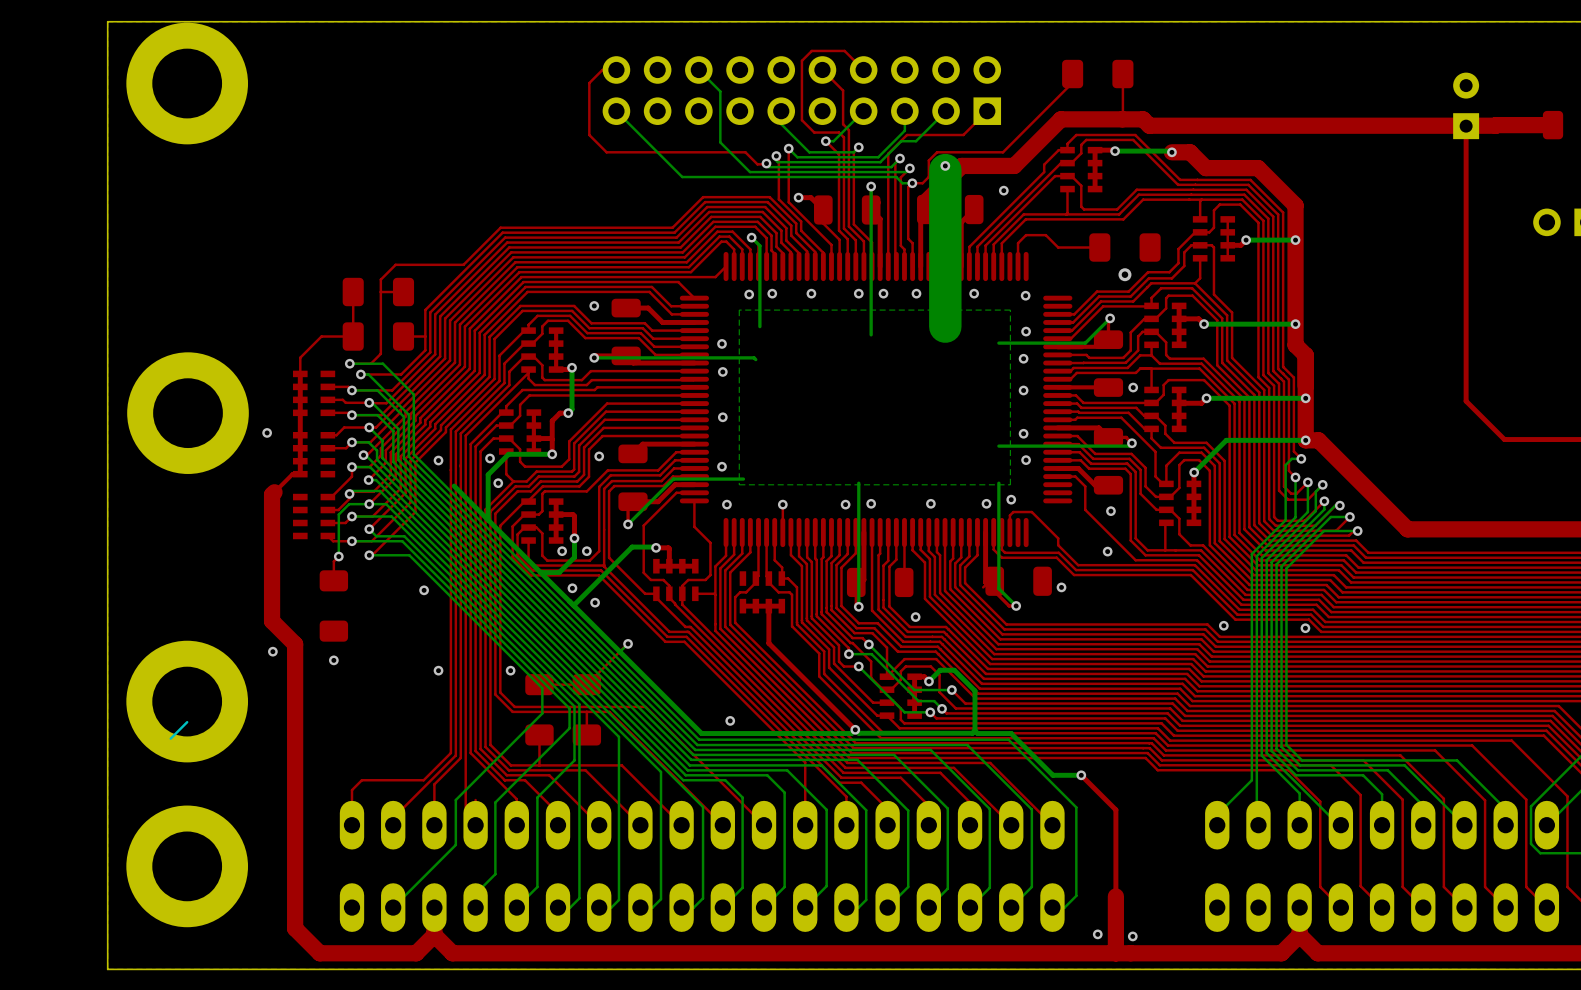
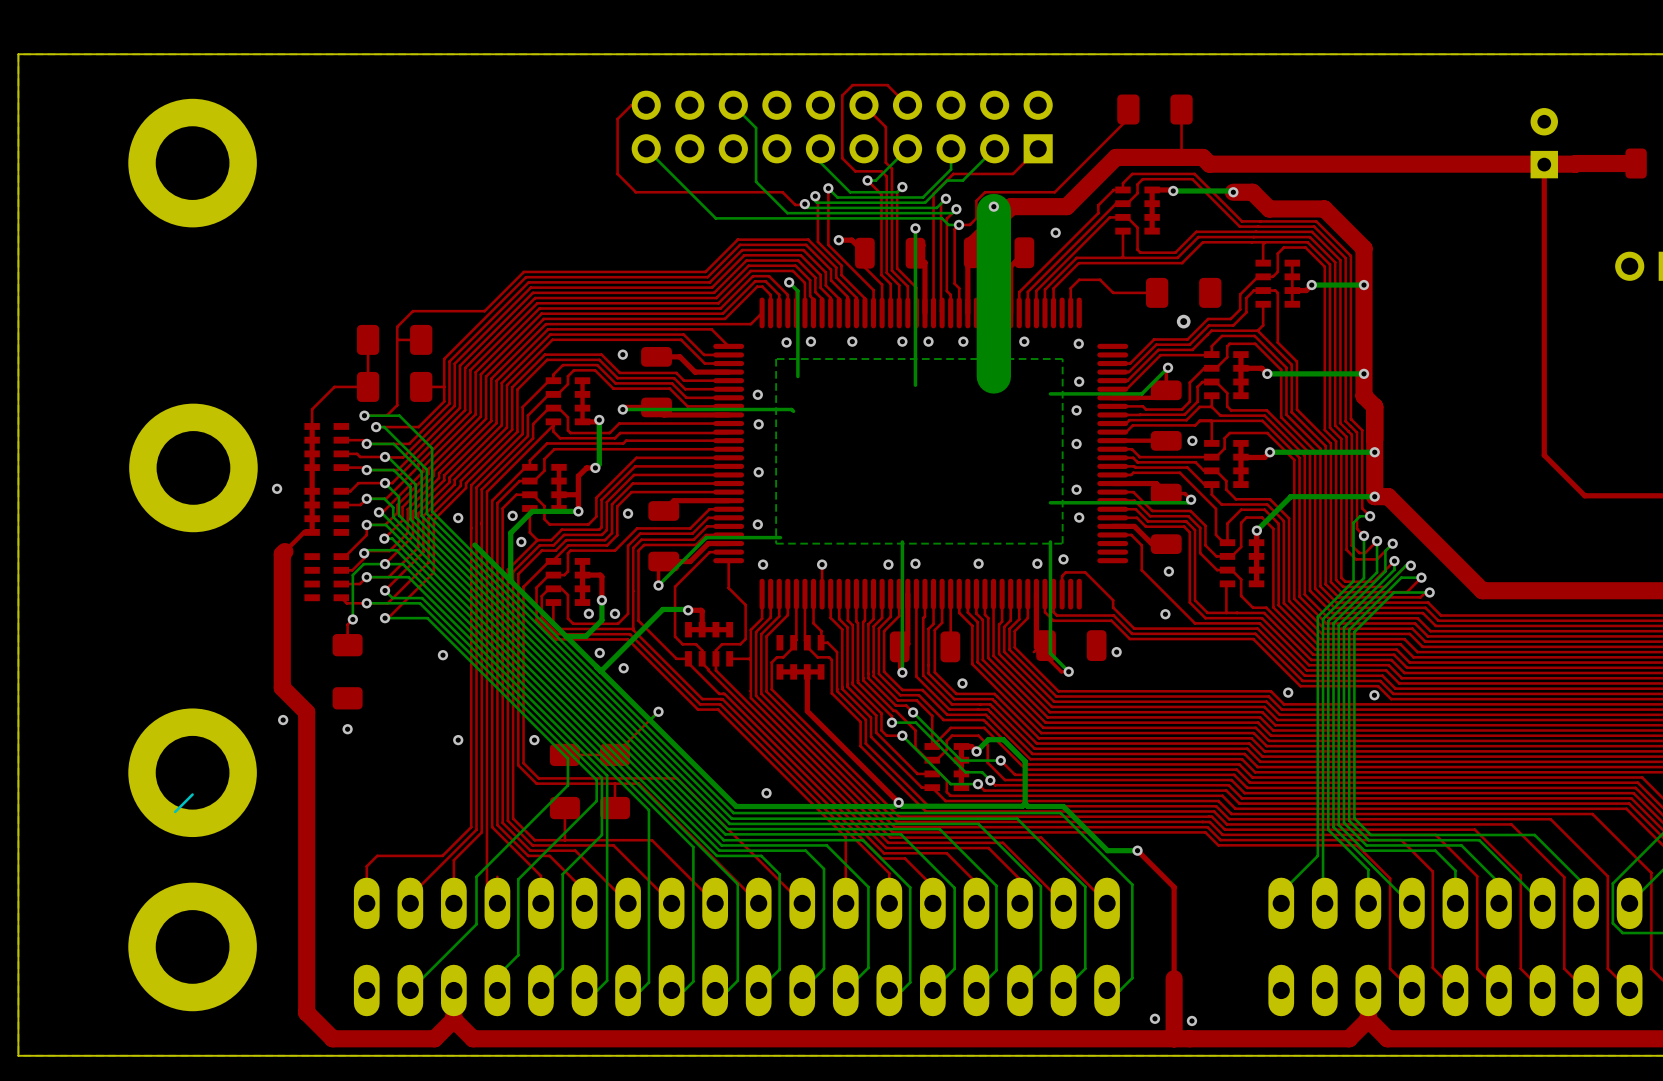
board edge: (107, 21) (107, 969) -> (108, 54) (18, 54) (18, 1055) (108, 1055)
part position: (187, 83) -> (192, 163)

